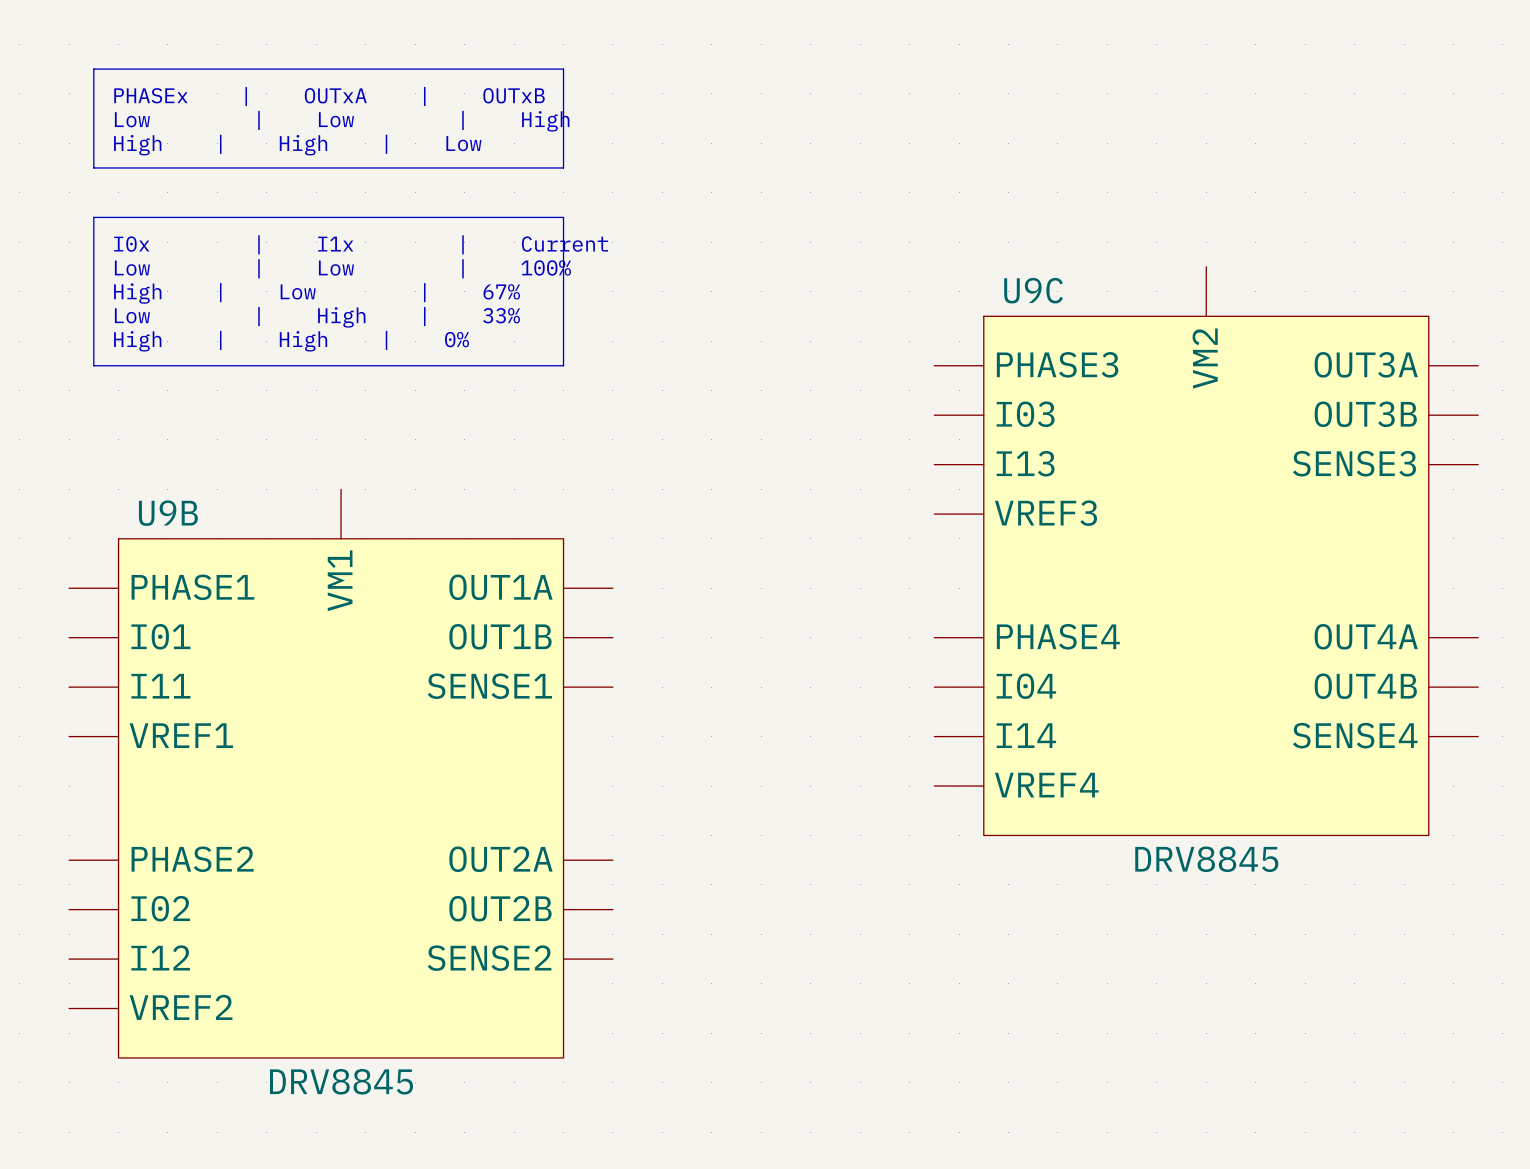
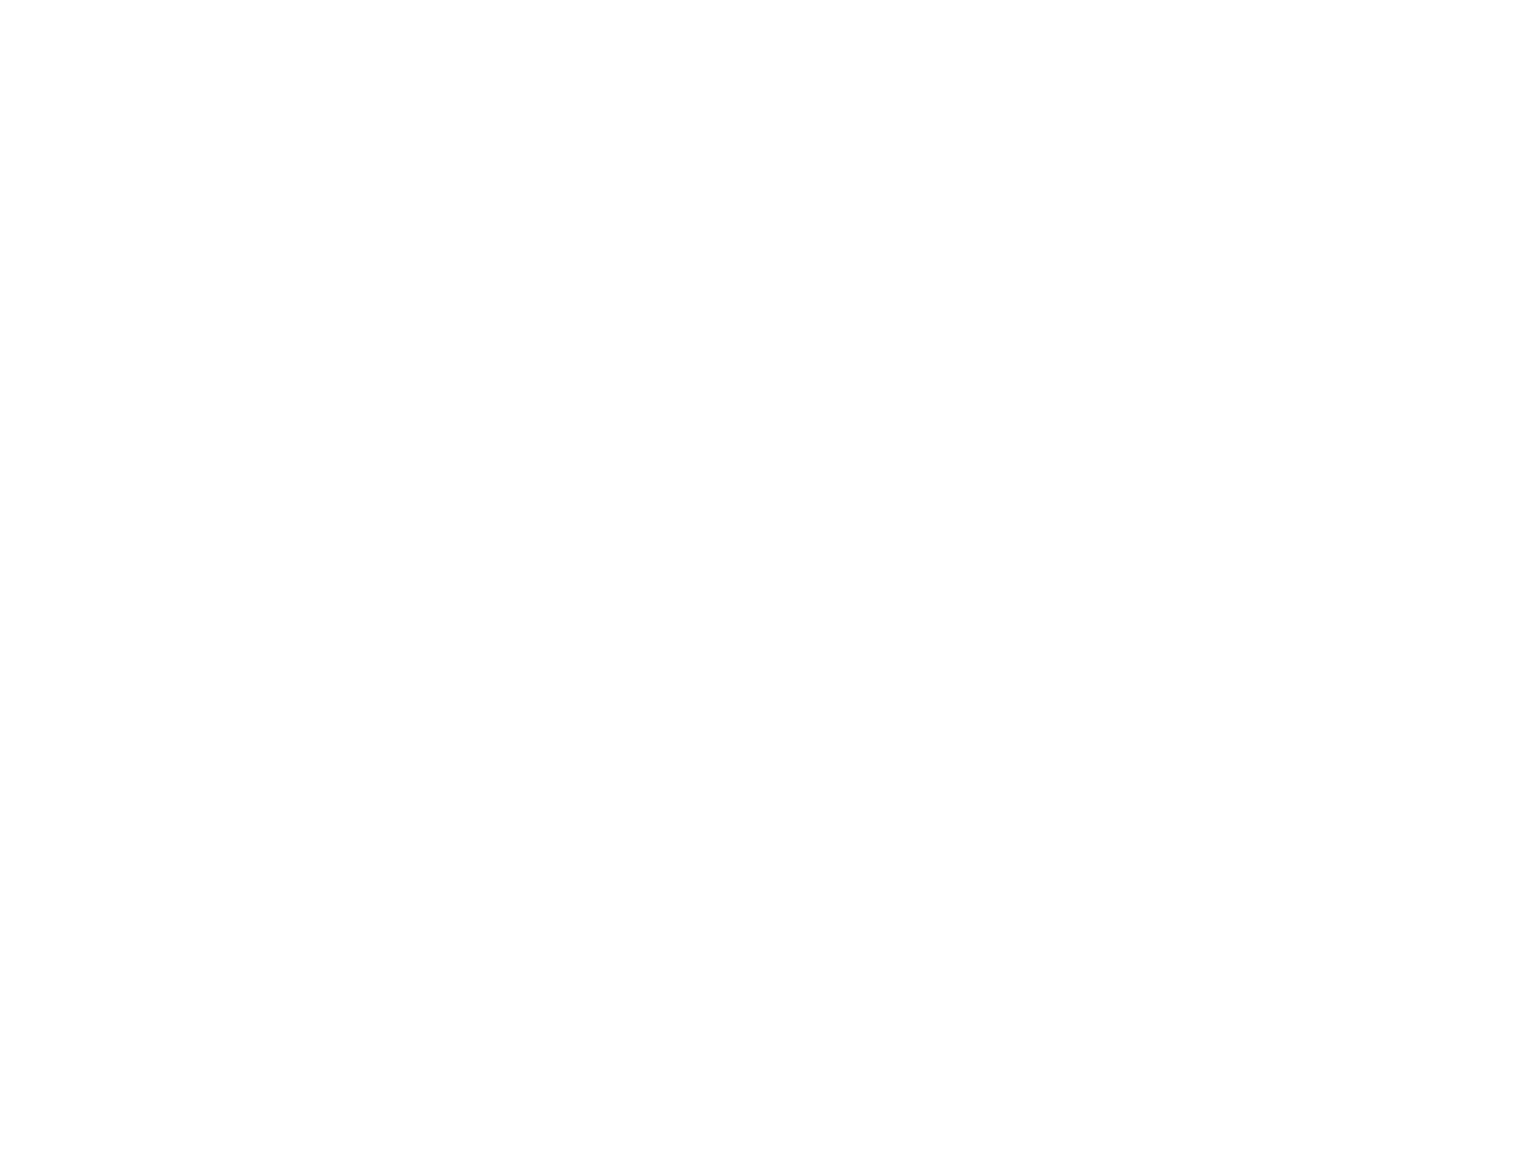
line: (93, 69) (93, 167) (563, 167) (563, 69) (93, 69) -> none
text: PHASEx | OUTxA | OUTxB (329, 96) -> none
text: Low | Low | High (342, 121) -> none
text: High | High | Low (297, 145) -> none
line: (93, 217) (563, 217) (563, 365) (93, 365) (93, 217) -> none
text: I0x | I1x | Current (361, 244) -> none
text: Low | Low | 100% (342, 268) -> none
text: High | Low | 67% (317, 293) -> none
text: Low | High | 33% (317, 317) -> none
text: High | High | 0% (291, 341) -> none
U9C: DRV8845 (1206, 551) -> none
U9B: DRV8845 (341, 773) -> none

